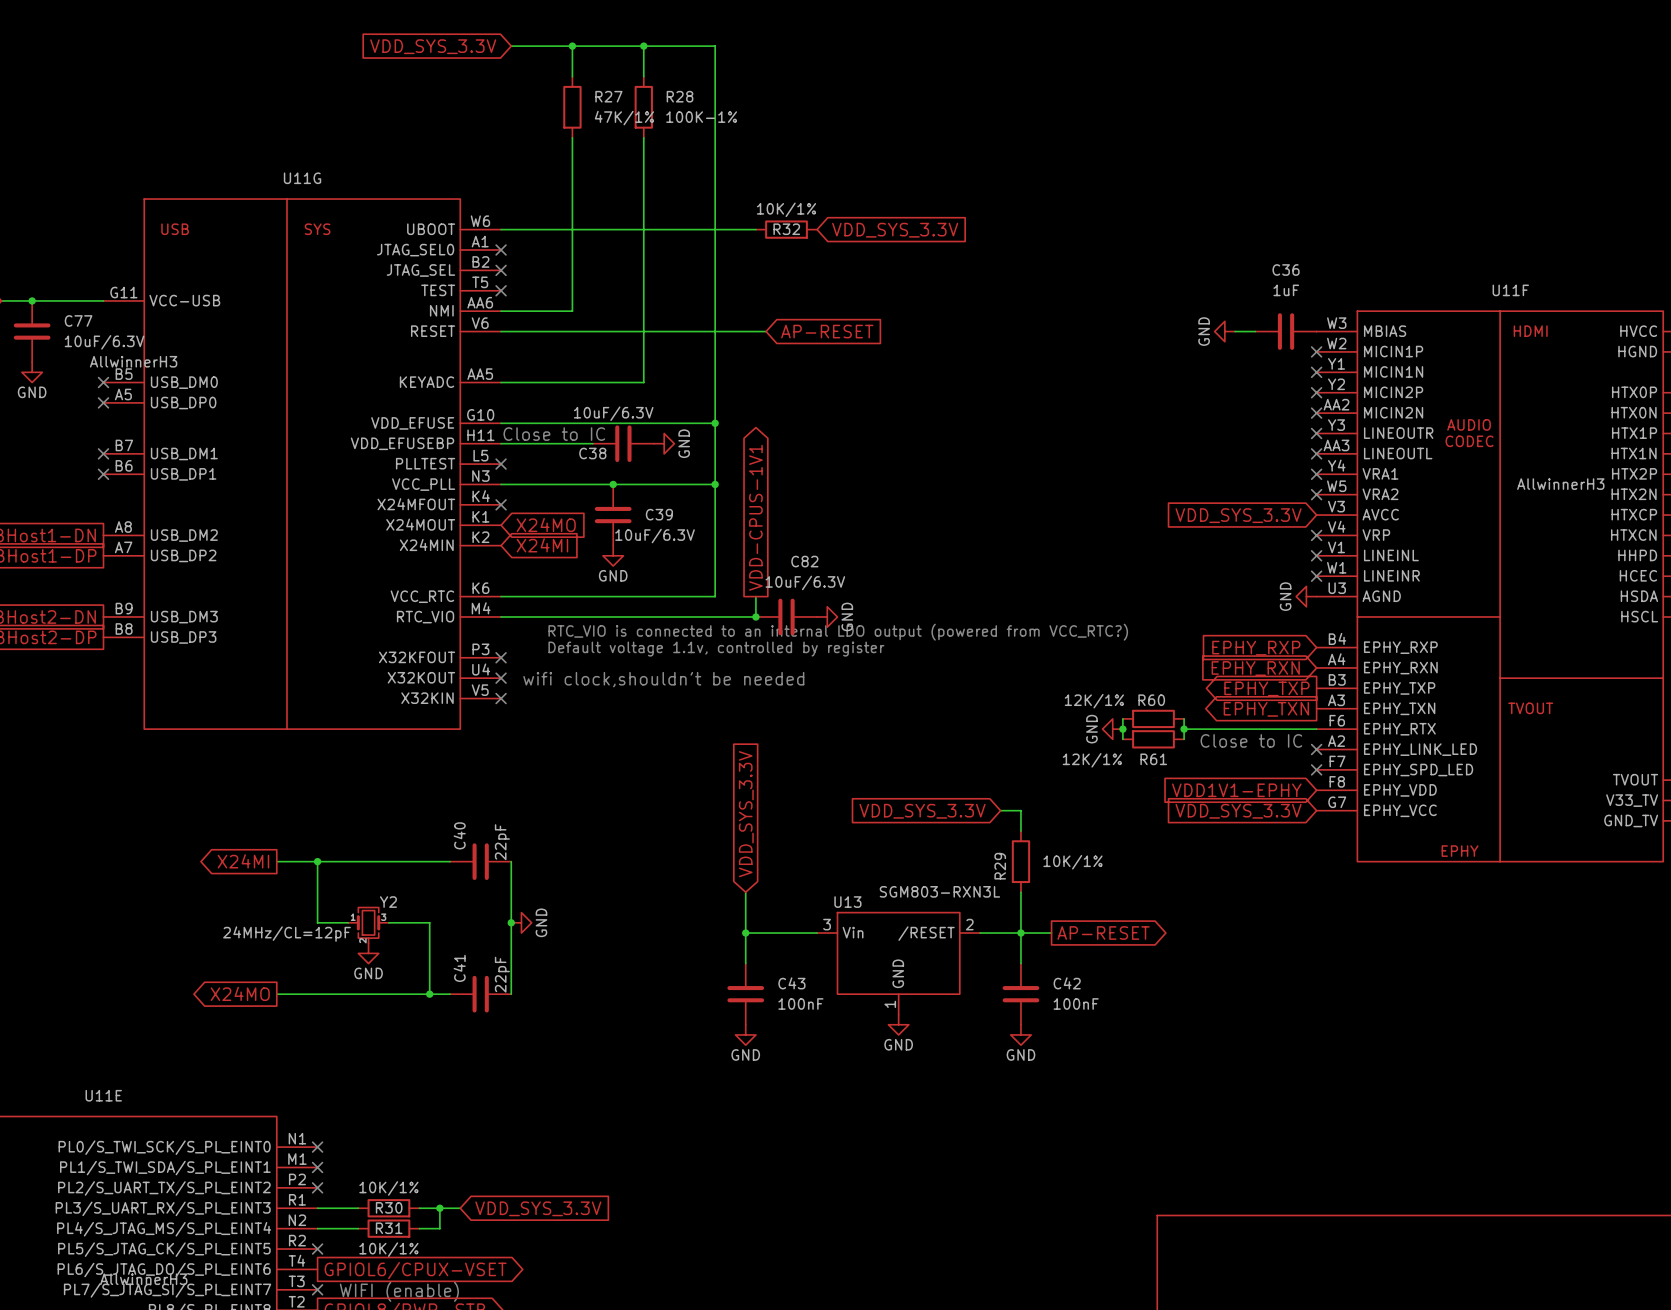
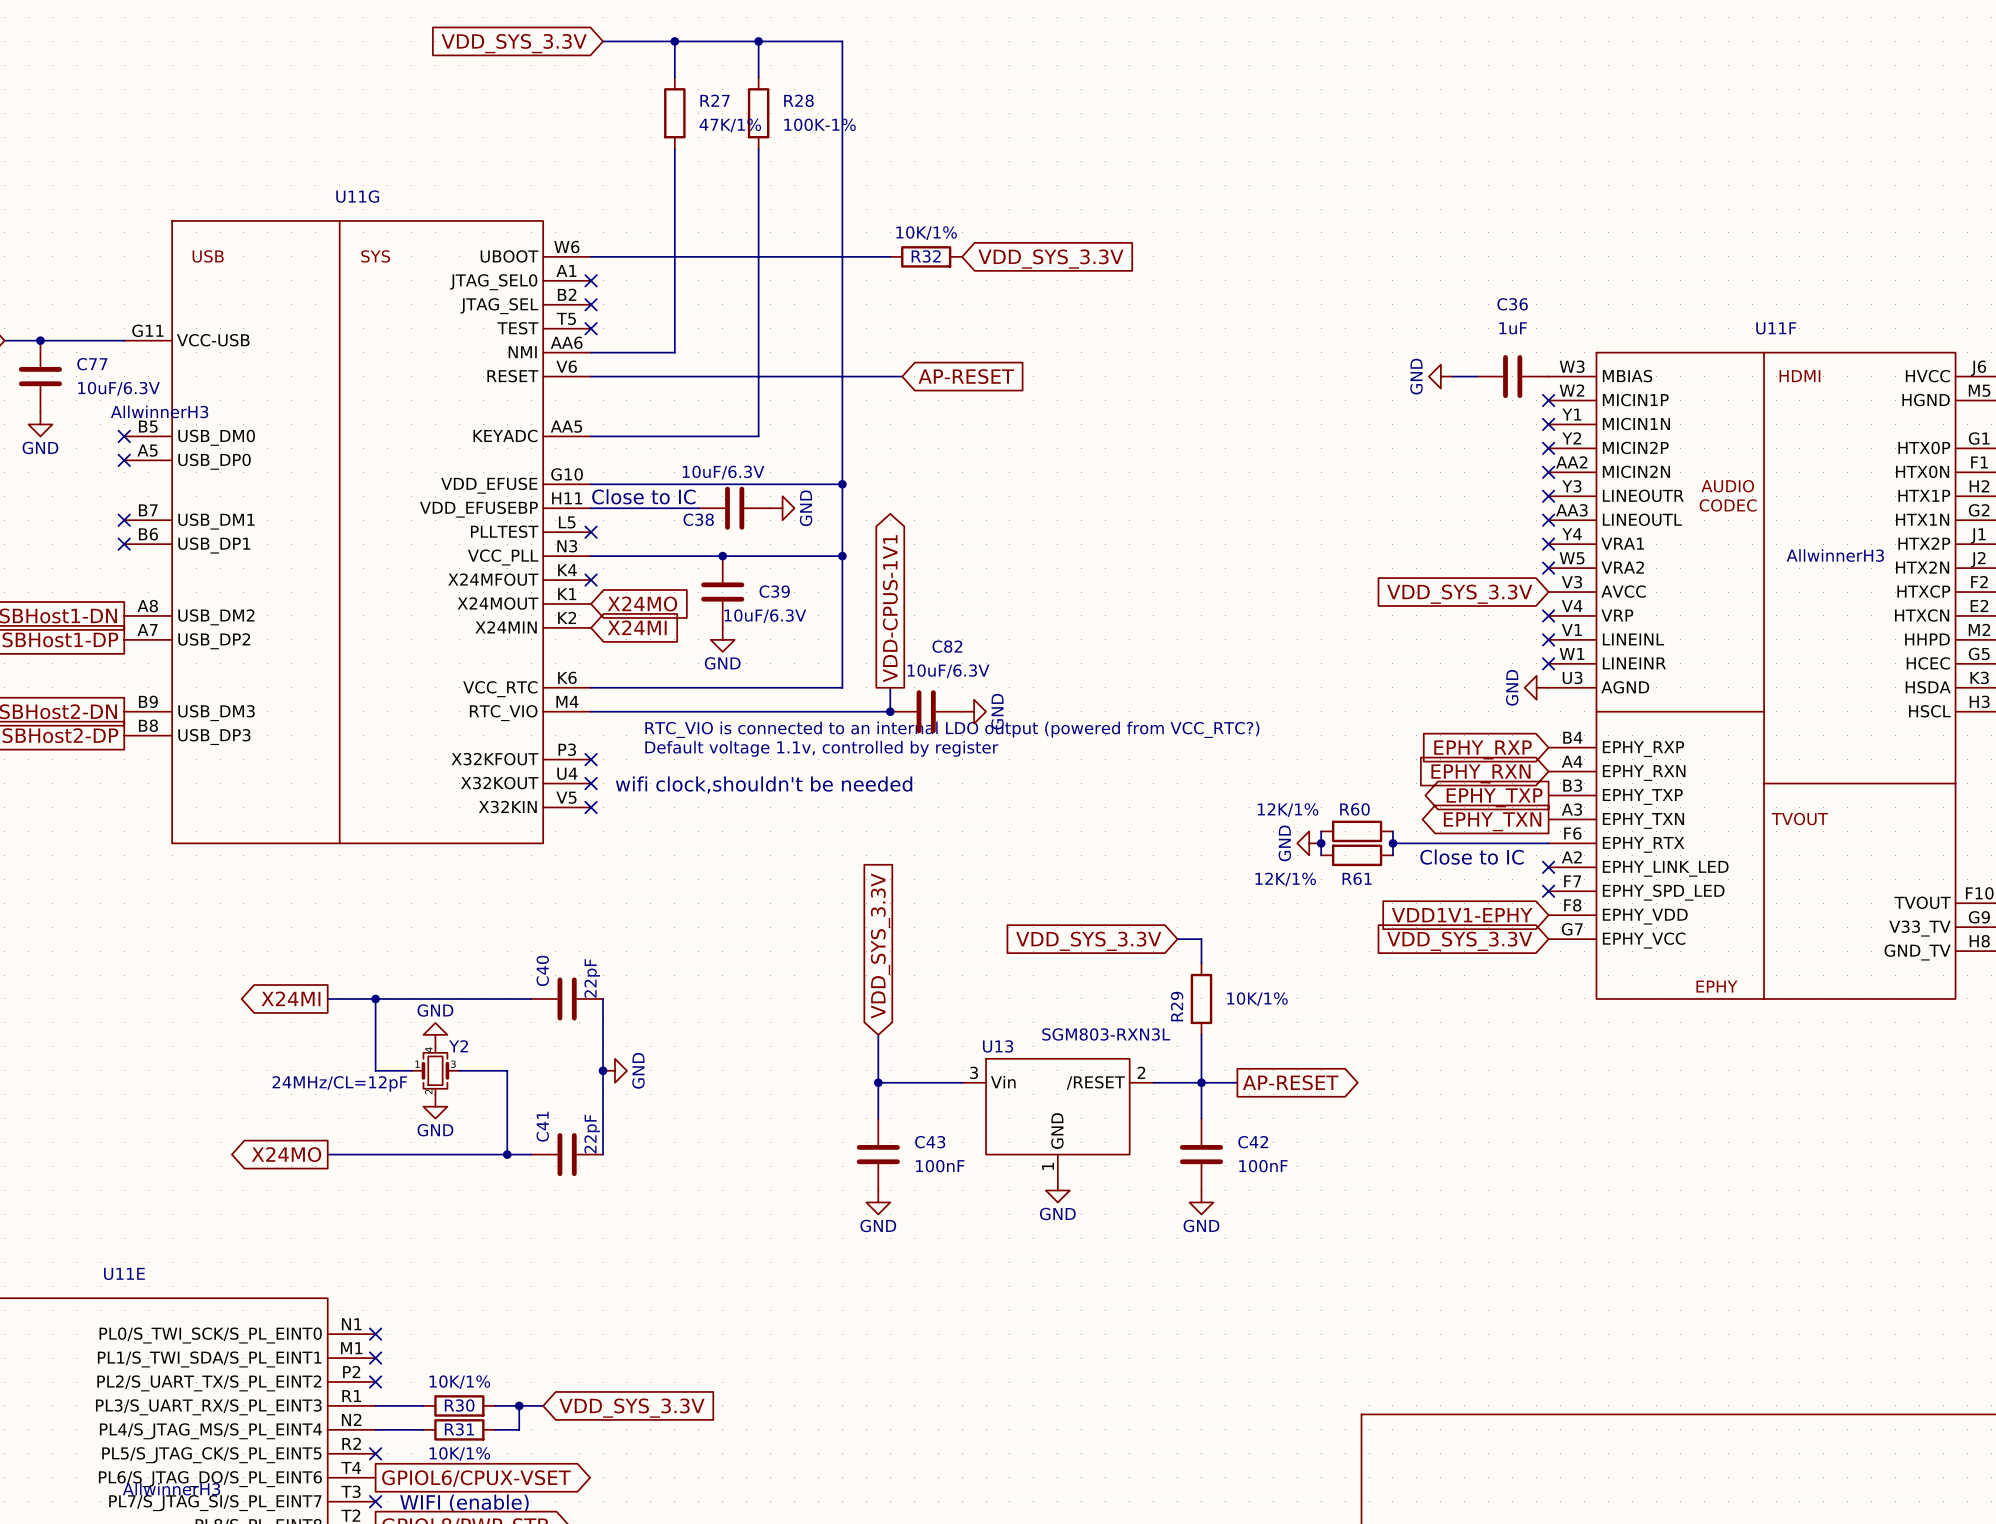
power symbol: none -> GND (435, 1034)
Y2 symbol: [348, 907, 389, 944] -> [411, 1046, 460, 1095]

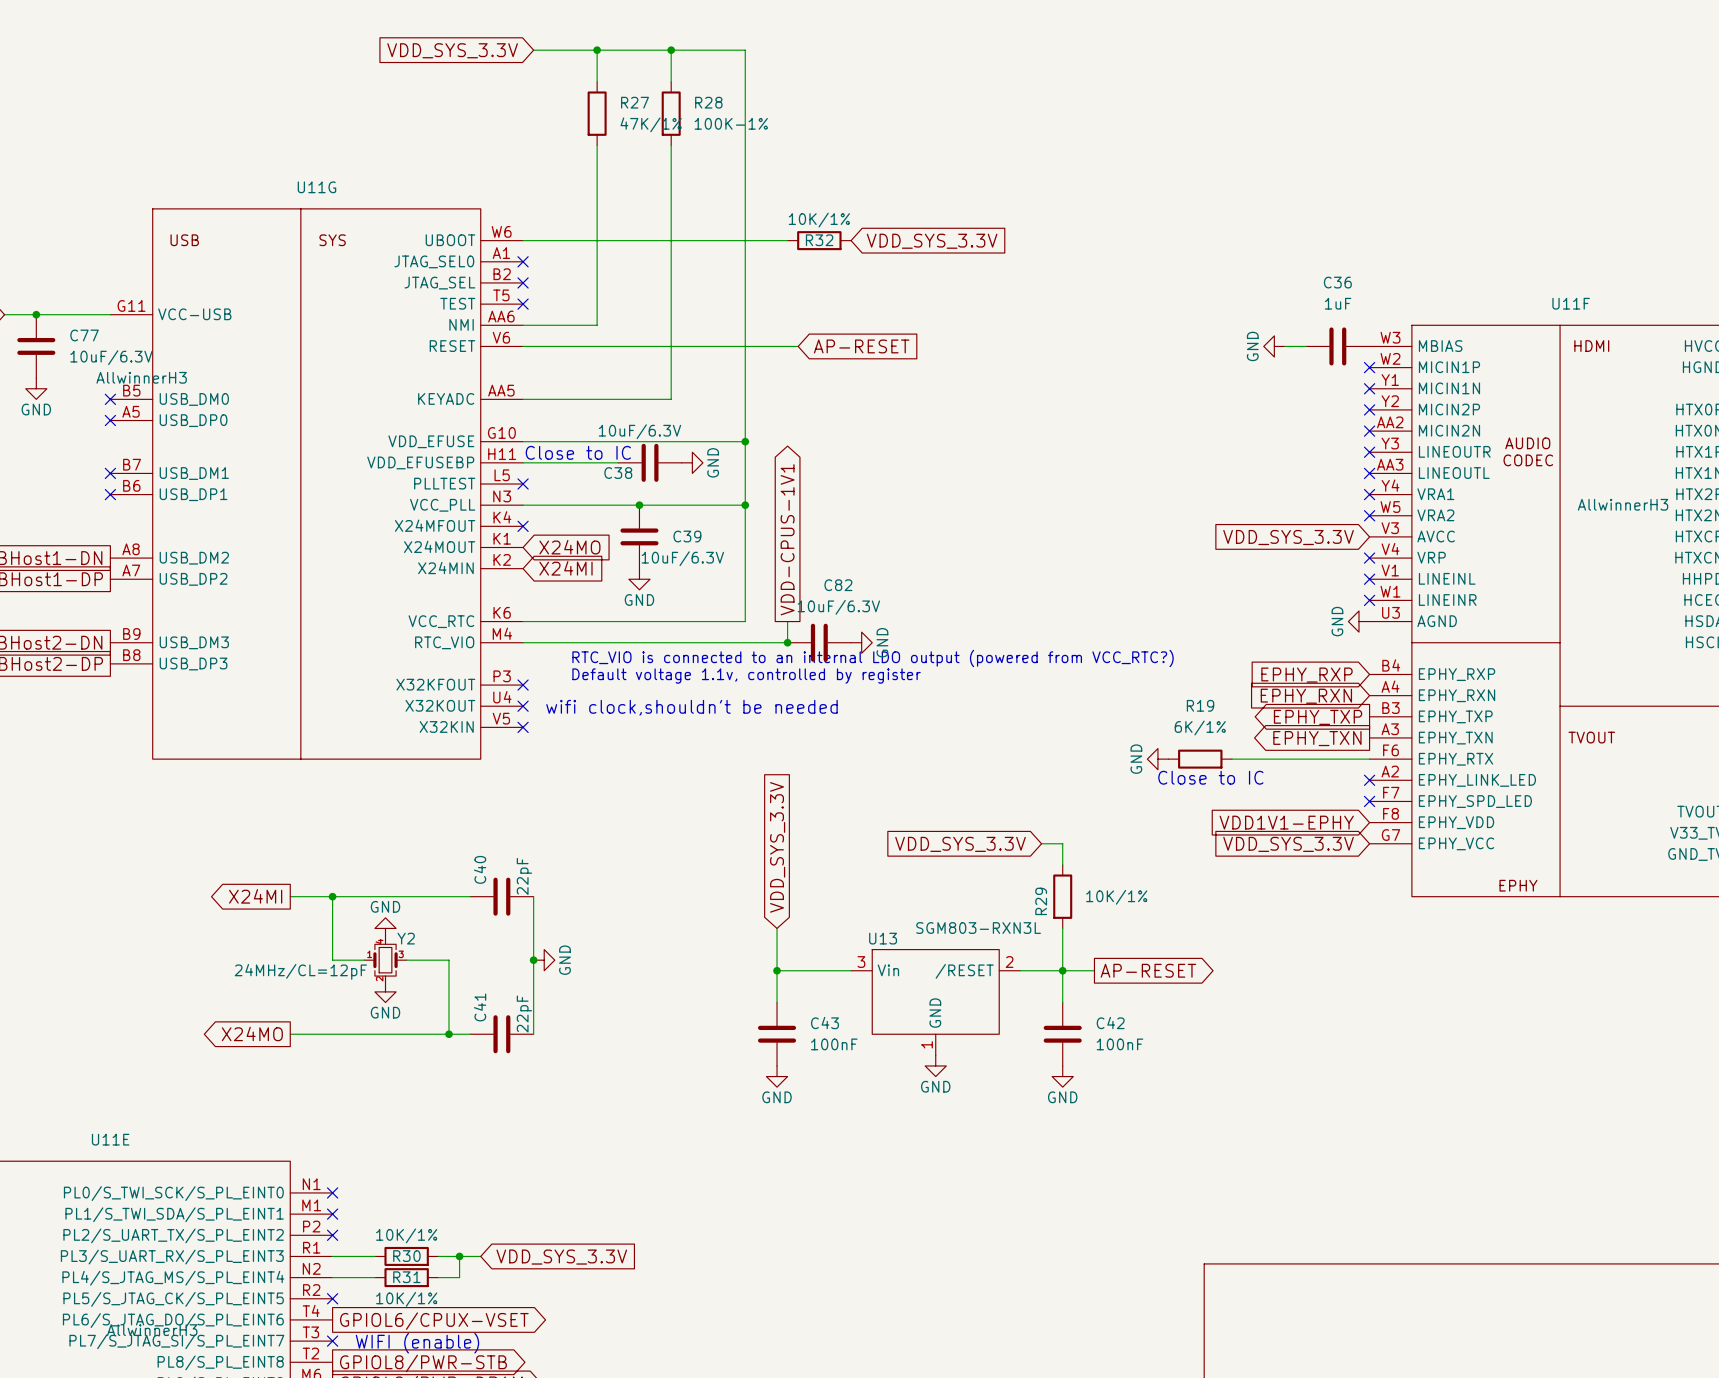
wire: (1321, 831) (1321, 855) -> none
R60: 12K/1% (1357, 831) -> none
wire: (1392, 831) (1392, 855) -> none
junction: (1321, 843) -> none
R19: none -> 6K/1% (1200, 759)
junction: (1392, 843) -> none
R61: 12K/1% (1357, 855) -> none
text position: Close to IC (1472, 857) -> Close to IC (1210, 777)

